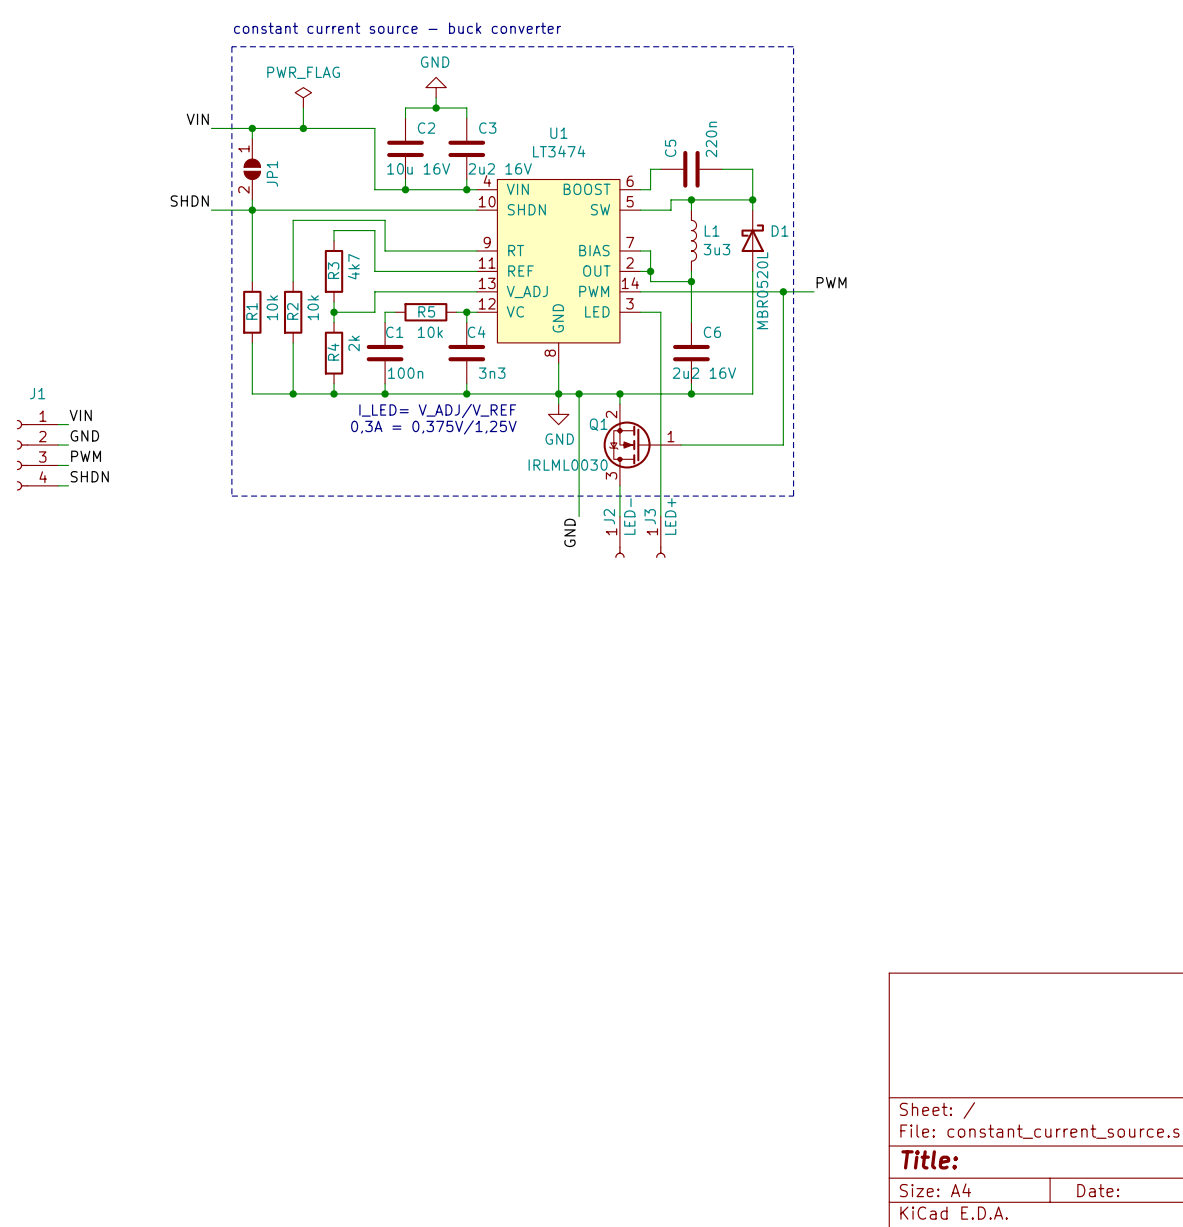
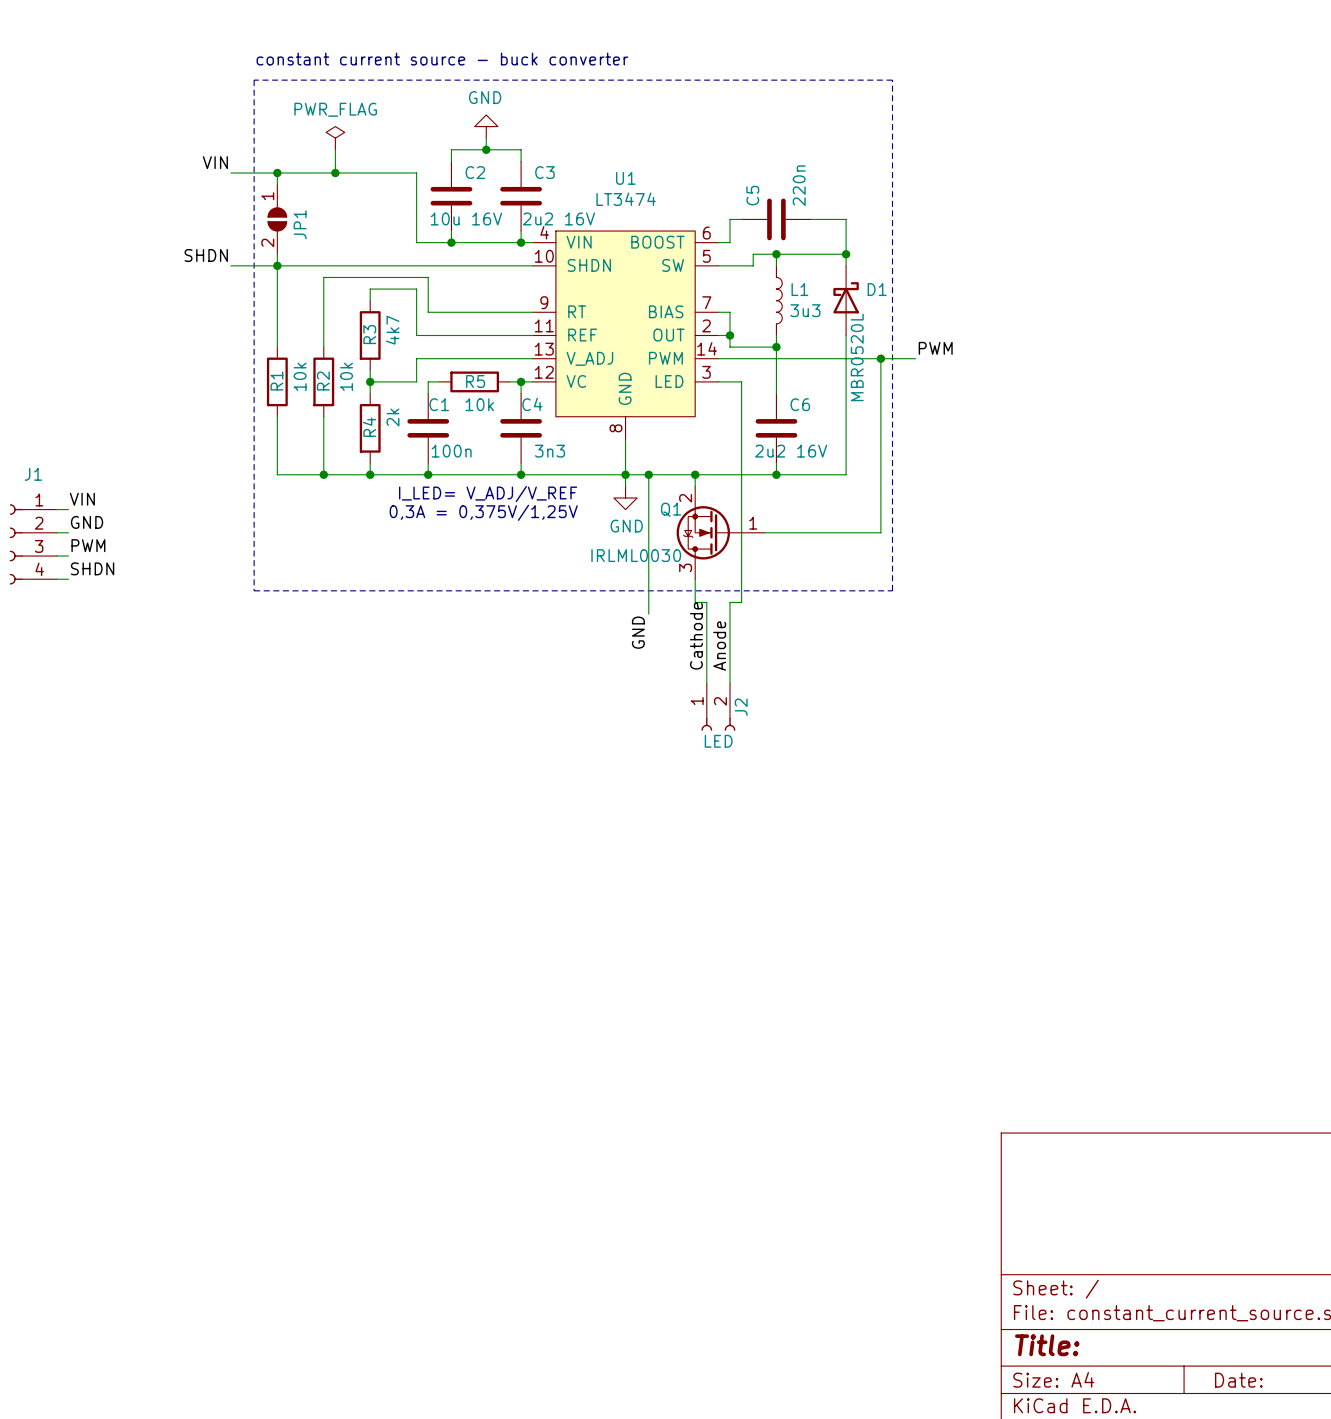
wire: (619, 506) (619, 516) -> (695, 602) (706, 602) (706, 683)
wire: (660, 506) (660, 516) -> (741, 602) (730, 602) (730, 683)
J2 name position: J2 (609, 516) -> J2 (741, 707)
J2 symbol: [615, 516, 625, 558] -> [701, 683, 736, 731]
J2 value: LED- (629, 516) -> LED (718, 741)
label: none -> Cathode (696, 636)
J3: LED+ (660, 537) -> none
label: none -> Anode (719, 646)

